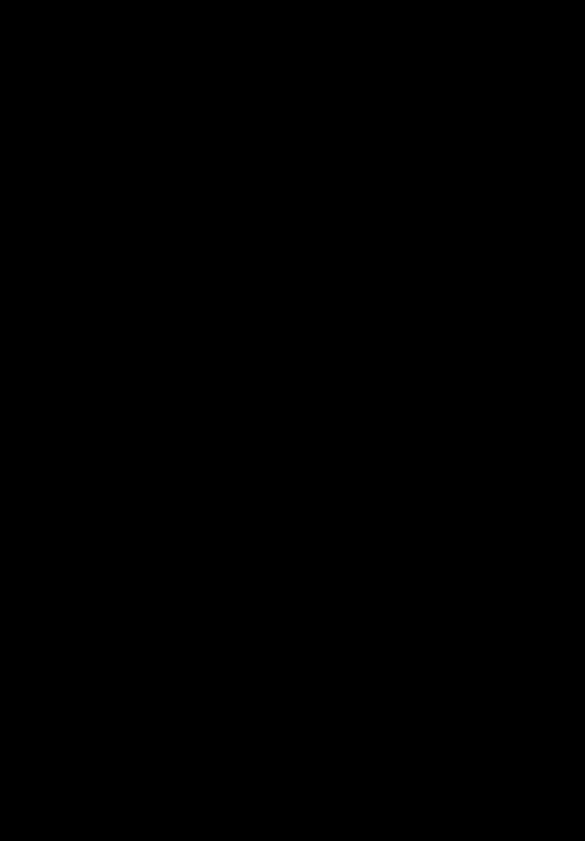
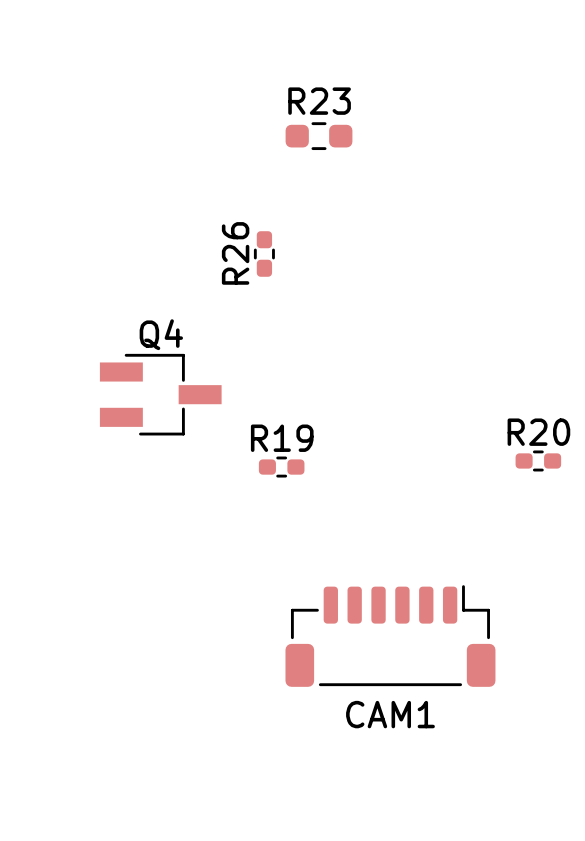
R23: none -> (319, 136)
R26: none -> (264, 253)
Q4: none -> (160, 394)
R20: none -> (538, 460)
R19: none -> (281, 467)
CAM1: none -> (390, 636)

